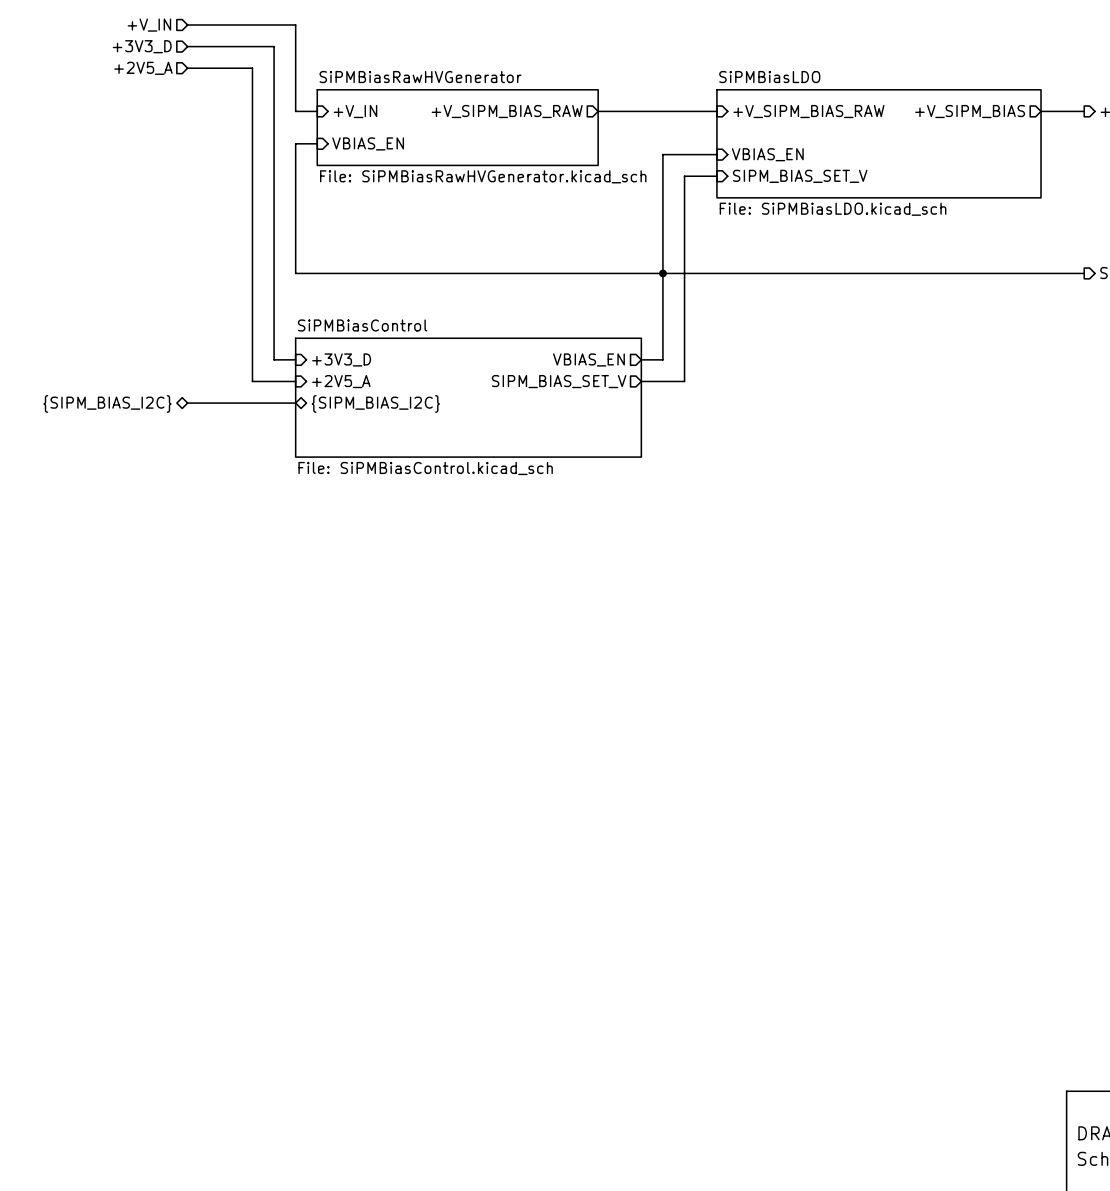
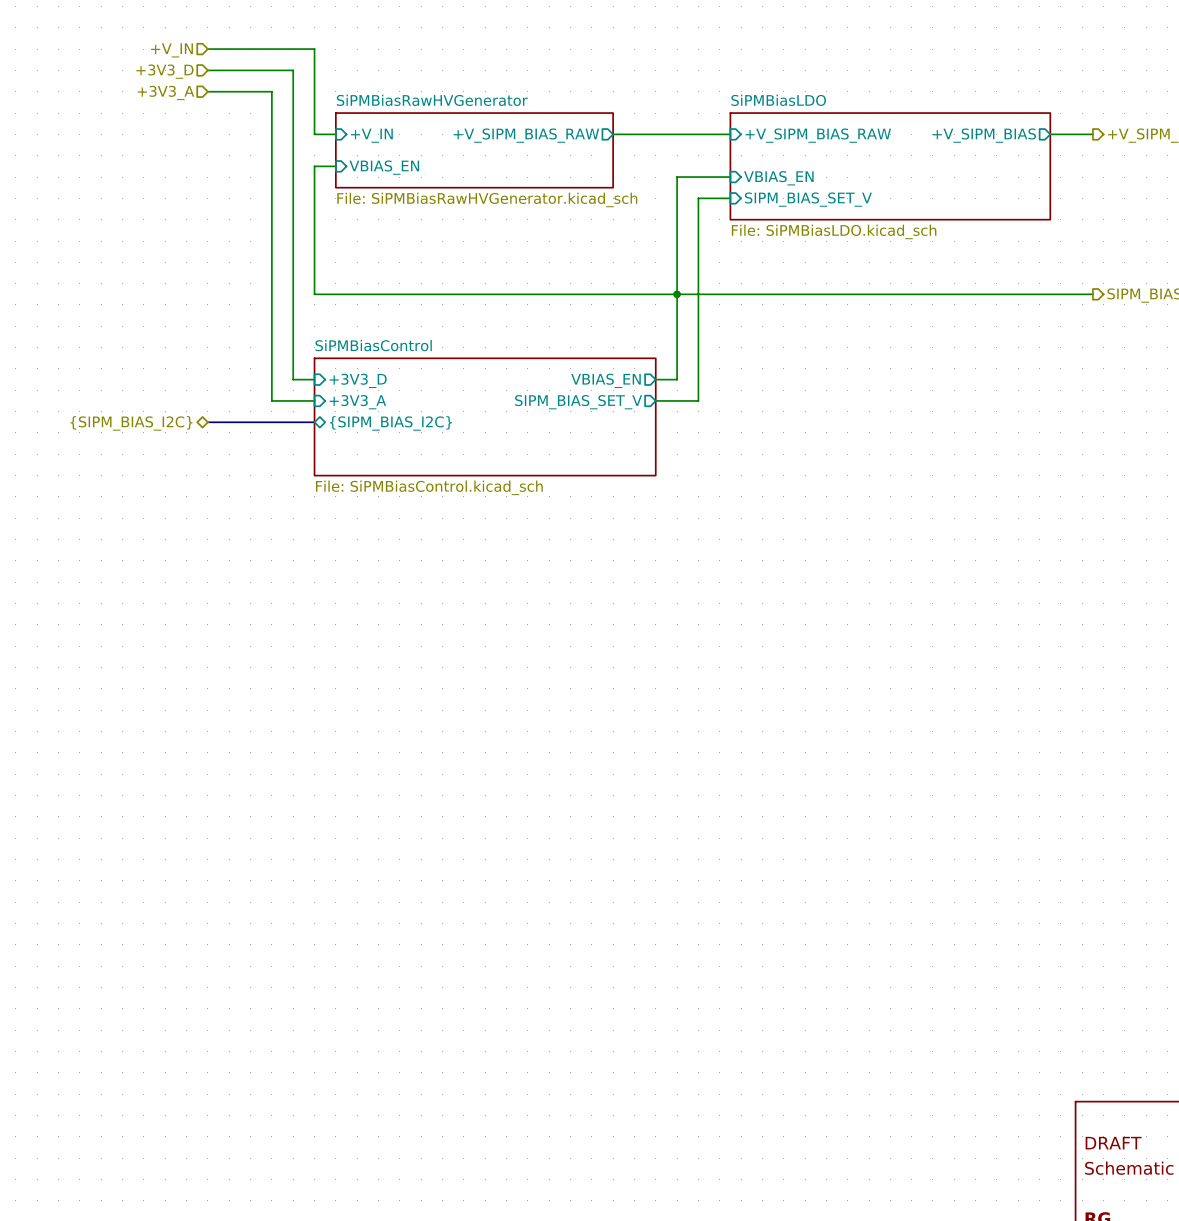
hierarchical label: +2V5_A (143, 68) -> +3V3_A (165, 92)
sheet pin: +2V5_A (341, 381) -> +3V3_A (357, 402)

